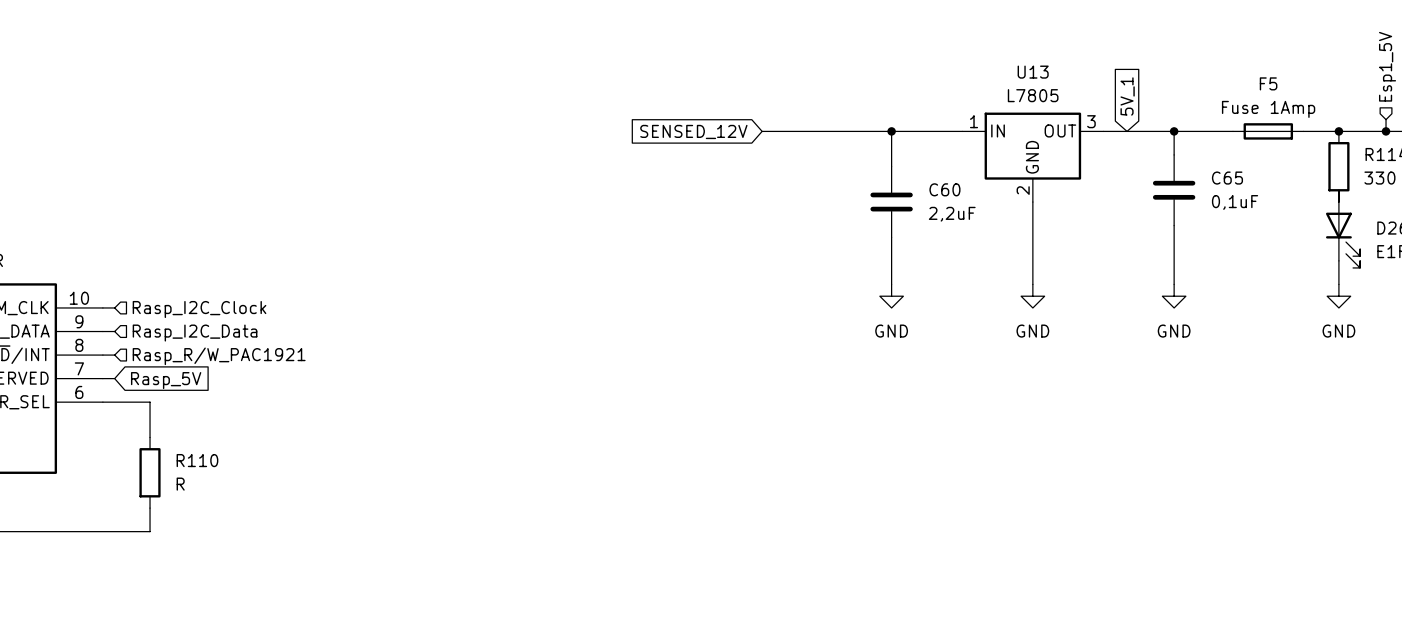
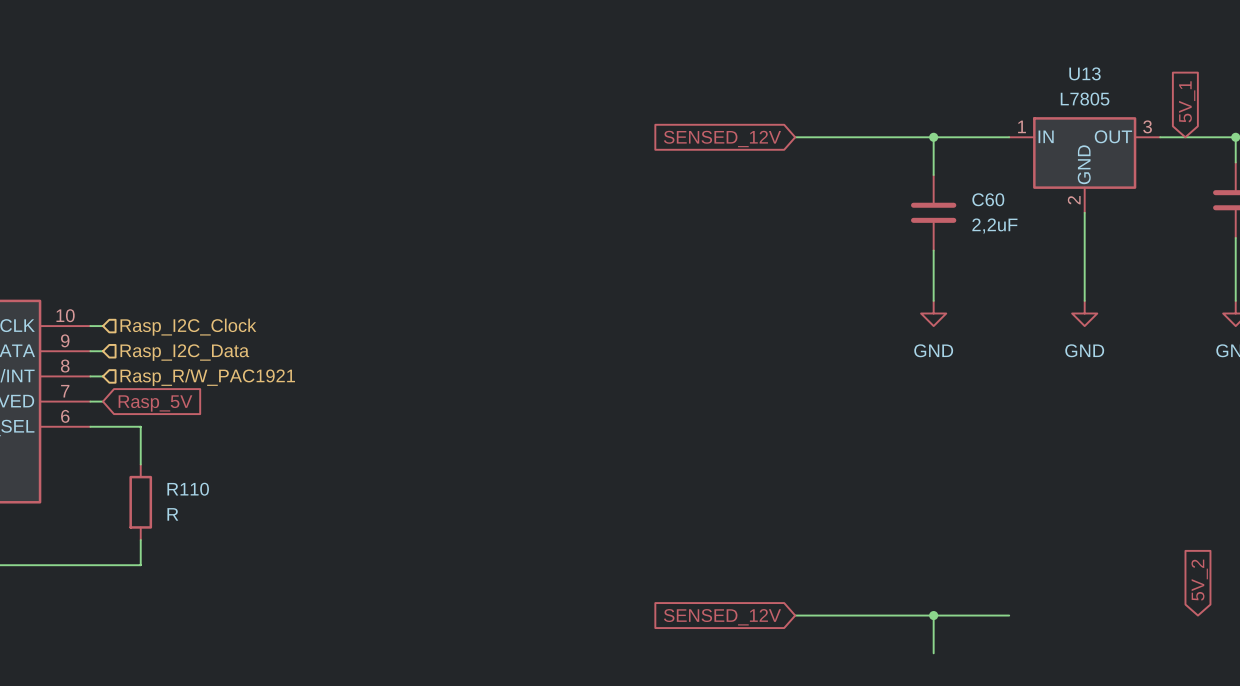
global label: none -> 5V_2 (1199, 580)
wire: none -> (795, 615) (1009, 615)
wire: none -> (933, 615) (933, 653)
junction: none -> (933, 615)
global label: none -> SENSED_12V (722, 617)

